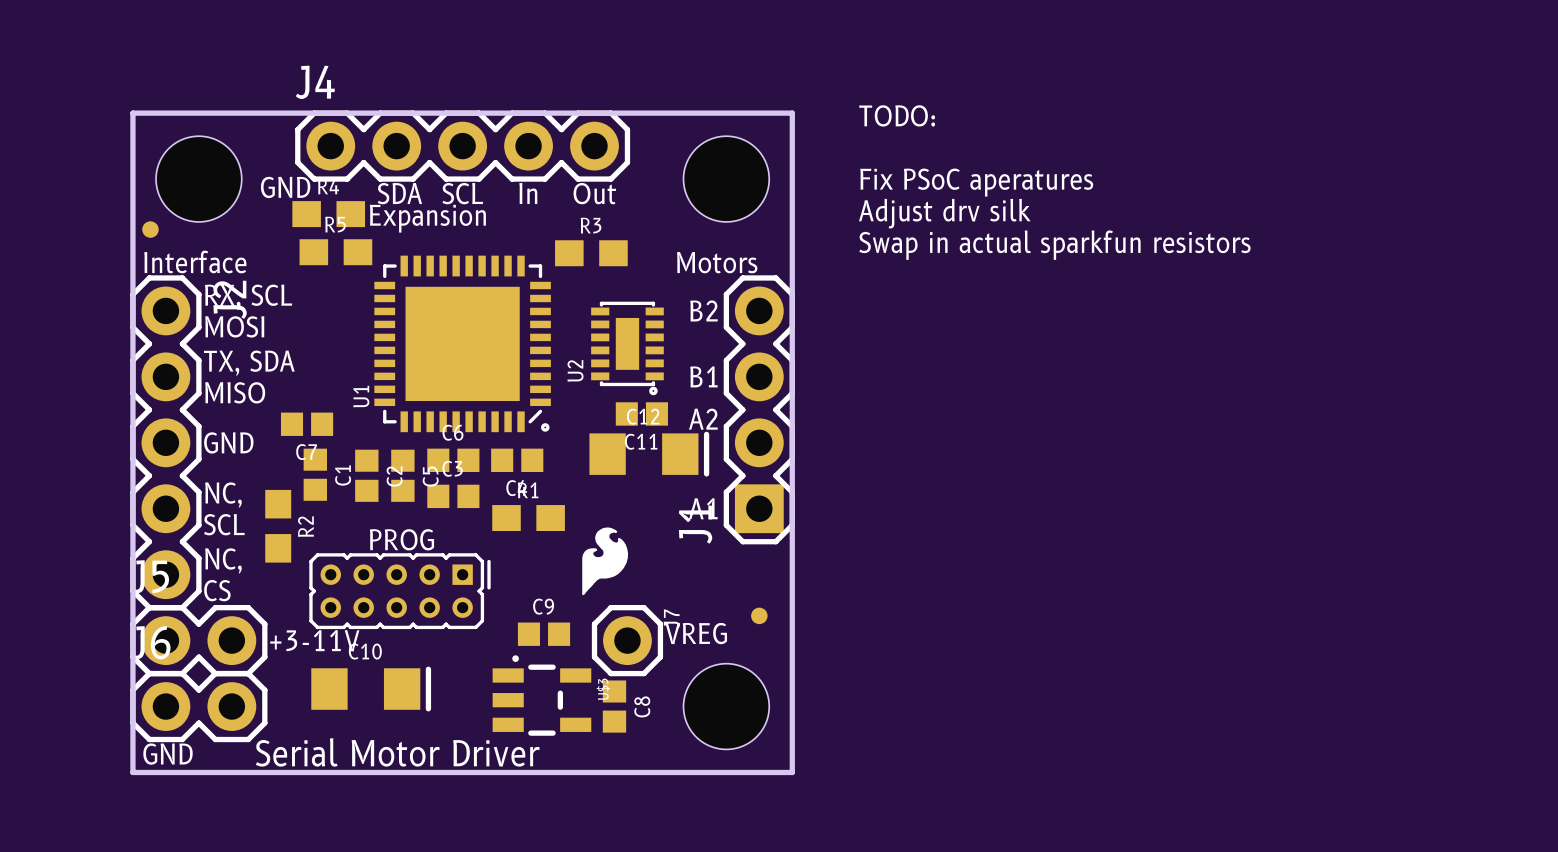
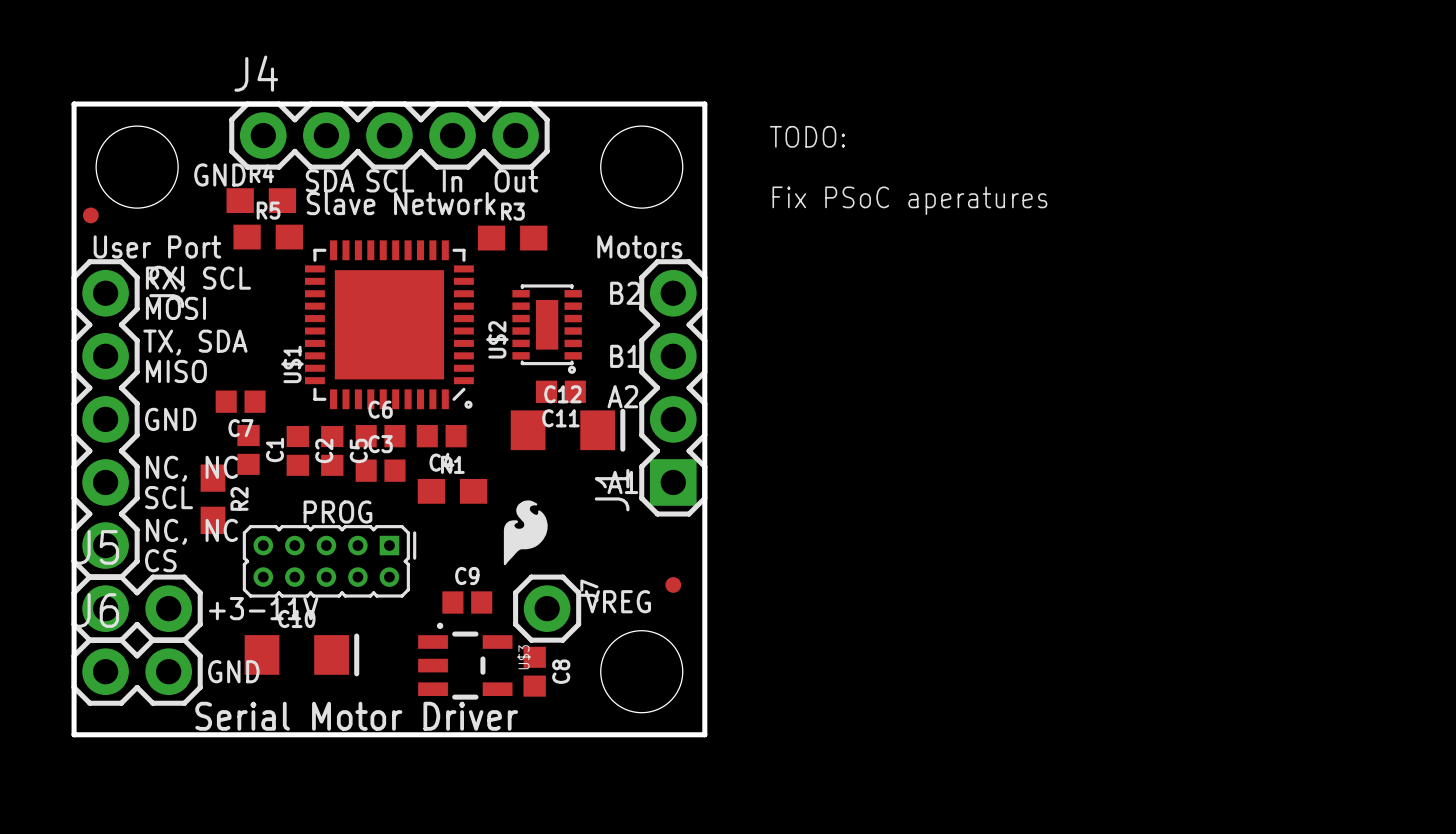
text position: TODO: (897, 115) -> TODO: (807, 136)
text: Fix PSoC aperatures (976, 182) -> none
text: Adjust drv silk (944, 213) -> Fix PSoC aperatures (909, 200)
text: Expansion (427, 218) -> Slave Network (401, 203)
text: Swap in actual sparkfun resistors (1054, 245) -> none
text: Interface (195, 261) -> User Port (157, 246)
U2 name: U2 (575, 370) -> U$2 (497, 339)
U1 name: U1 (361, 396) -> U$1 (292, 364)
text: NC, (223, 495) -> NC, NC (191, 468)
text: NC, (223, 560) -> NC, NC (191, 531)
text position: GND (168, 754) -> GND (233, 671)

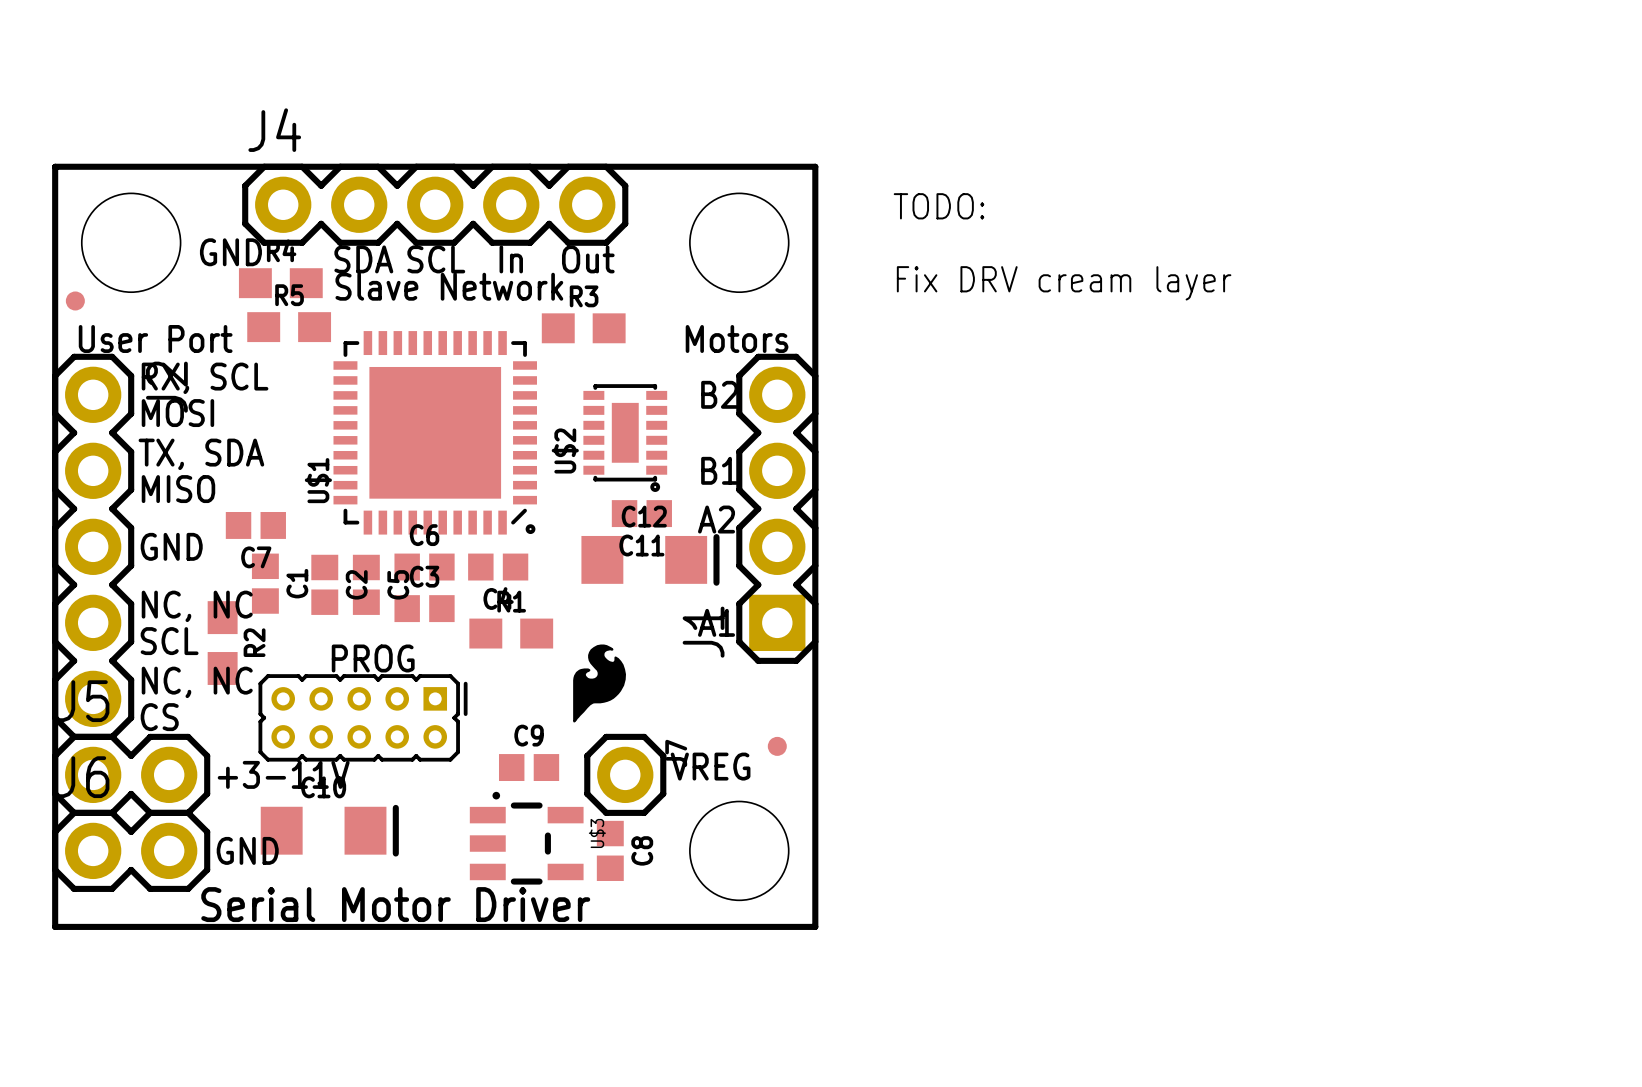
text: Fix PSoC aperatures (909, 200) -> Fix DRV cream layer (1064, 283)

